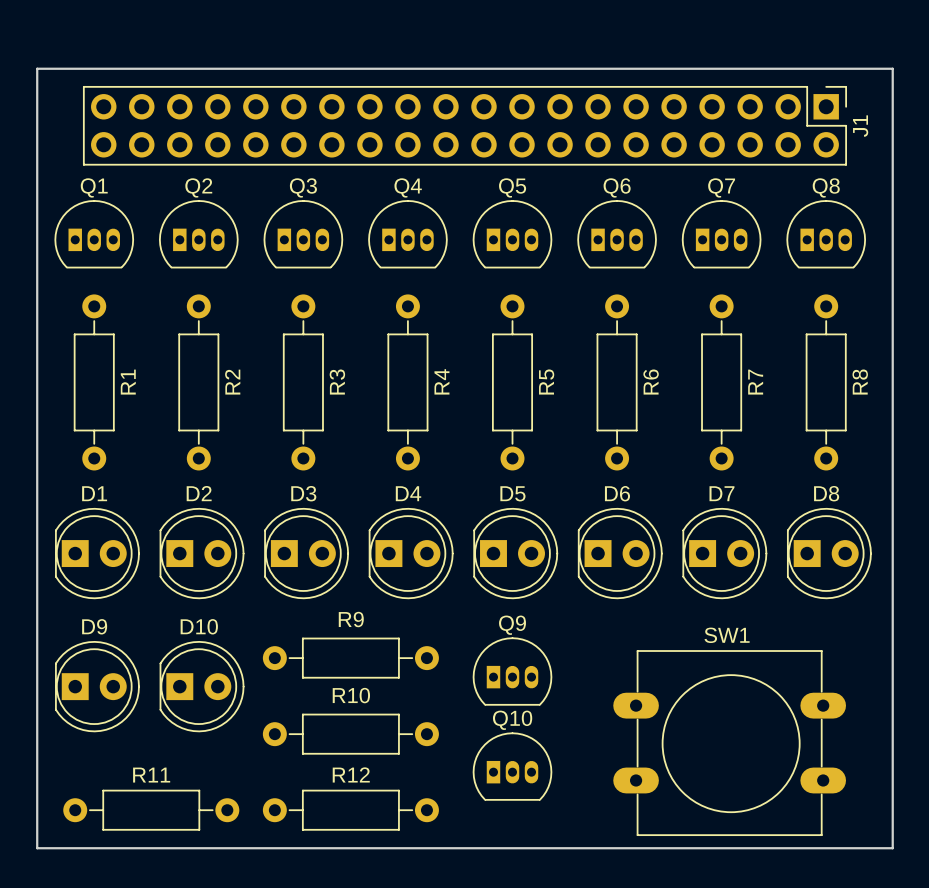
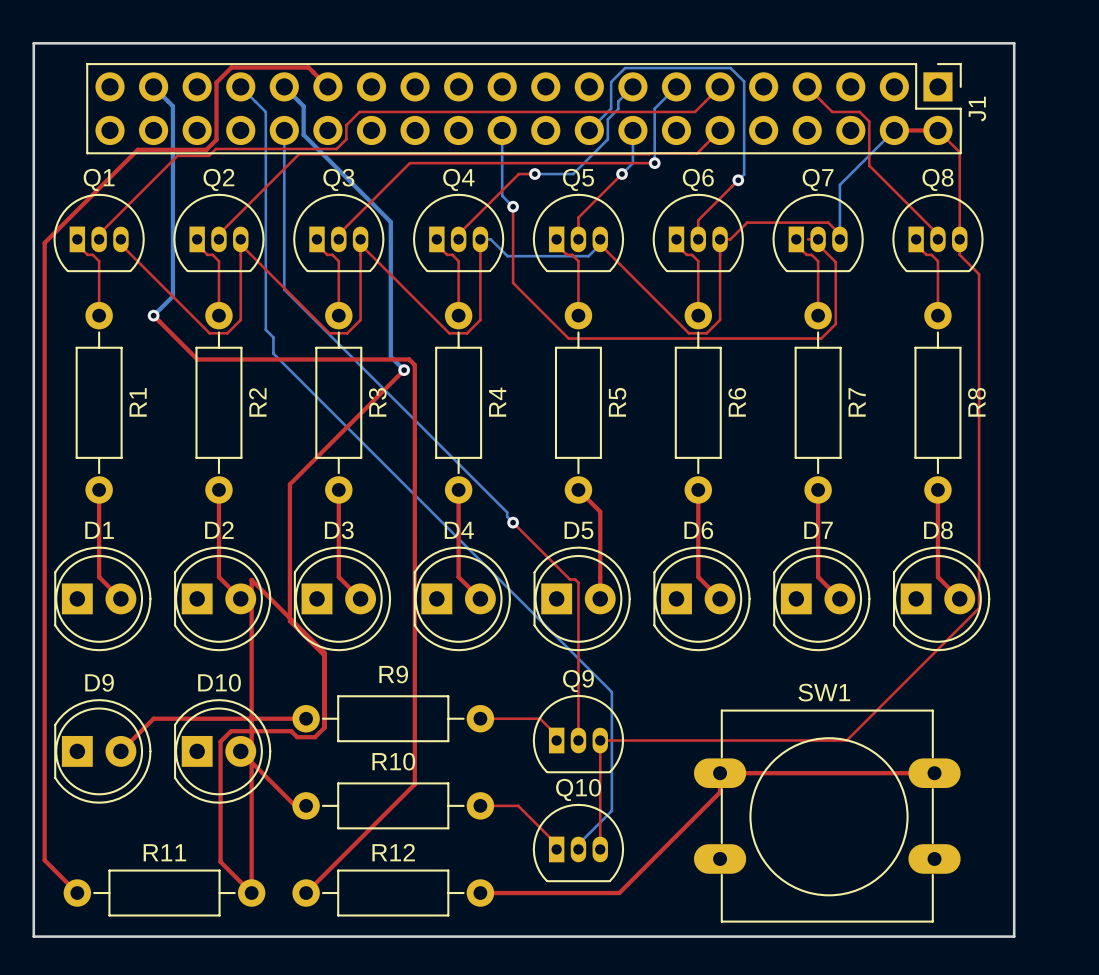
bottom track: none -> (153, 86) (172, 106) (172, 296) (153, 315)
bottom track: none -> (240, 86) (265, 111) (265, 329) (273, 337) (273, 353) (611, 692) (611, 810) (578, 844) (578, 849)
bottom track: none -> (284, 86) (303, 106) (303, 134) (390, 222) (390, 356) (404, 370)
top track: none -> (327, 86) (308, 67) (231, 67) (216, 82) (216, 139) (206, 149) (137, 149) (44, 242) (44, 860) (77, 893)
bottom track: none -> (632, 86) (618, 101) (618, 108) (607, 119) (607, 139) (573, 174) (534, 174)
bottom track: none -> (676, 86) (654, 108) (654, 163)
top track: none -> (720, 86) (695, 111) (359, 111) (346, 125) (346, 139) (336, 148) (215, 148) (208, 155) (177, 155) (99, 234) (99, 239)
top track: none -> (807, 86) (832, 111) (859, 111) (869, 121) (869, 165) (937, 234) (937, 239)
bottom track: none -> (284, 130) (284, 289) (507, 512) (507, 516) (513, 522)
bottom track: none -> (502, 130) (502, 195) (513, 206)
bottom track: none -> (589, 130) (611, 108) (611, 82) (625, 68) (730, 68) (744, 81) (744, 174) (738, 180)
bottom track: none -> (632, 130) (632, 163) (622, 174)
top track: none -> (720, 130) (697, 153) (299, 154) (218, 234) (218, 239)
top track: none -> (894, 130) (937, 130) (959, 152) (959, 254) (979, 274) (979, 608) (846, 740) (600, 740) (600, 849)
bottom track: none -> (894, 130) (839, 184) (839, 239)
top track: none -> (654, 163) (409, 163) (338, 234) (338, 239)
via: none -> (654, 163)
top track: none -> (534, 174) (518, 174) (458, 234) (458, 239)
via: none -> (534, 174)
top track: none -> (622, 174) (578, 217) (578, 239)
via: none -> (622, 174)
top track: none -> (738, 180) (698, 220) (698, 239)
via: none -> (738, 180)
top track: none -> (513, 206) (513, 282) (568, 338) (821, 338) (835, 324) (835, 262) (818, 244) (818, 239) (807, 239)
via: none -> (513, 206)
top track: none -> (77, 239) (77, 244) (87, 254) (92, 254) (99, 261) (99, 315)
top track: none -> (120, 239) (120, 244) (209, 333) (227, 333) (240, 319) (240, 239)
top track: none -> (197, 239) (197, 244) (207, 254) (212, 254) (218, 261) (218, 315)
top track: none -> (317, 239) (317, 244) (327, 254) (332, 254) (338, 261) (338, 315)
top track: none -> (360, 239) (360, 319) (347, 333) (329, 333) (240, 244)
top track: none -> (436, 239) (436, 244) (447, 254) (452, 254) (458, 261) (458, 315)
top track: none -> (480, 239) (480, 319) (467, 333) (449, 333) (360, 244)
bottom track: none -> (480, 239) (490, 239) (507, 256) (588, 256) (600, 244) (600, 239)
top track: none -> (556, 239) (556, 244) (567, 254) (572, 254) (578, 261) (578, 315)
top track: none -> (600, 239) (600, 244) (689, 333) (706, 333) (720, 319) (720, 239) (730, 239) (747, 222) (828, 222) (839, 234) (839, 239)
top track: none -> (676, 239) (676, 244) (686, 254) (691, 254) (698, 261) (698, 315)
top track: none -> (796, 239) (796, 244) (806, 254) (811, 254) (818, 261) (818, 315)
top track: none -> (916, 239) (916, 244) (926, 254) (931, 254) (937, 261) (937, 315)
top track: none -> (153, 315) (197, 359) (409, 359) (414, 365) (414, 784) (306, 893)
via: none -> (153, 315)
top track: none -> (404, 370) (289, 484) (289, 621) (324, 655)
via: none -> (404, 370)
top track: none -> (99, 489) (99, 577) (120, 598)
top track: none -> (218, 489) (218, 577) (240, 598)
top track: none -> (338, 489) (338, 577) (360, 598)
top track: none -> (458, 489) (458, 577) (480, 598)
top track: none -> (578, 489) (600, 511) (600, 598)
top track: none -> (698, 489) (698, 577) (720, 598)
top track: none -> (818, 489) (818, 577) (839, 598)
top track: none -> (937, 489) (937, 577) (959, 598)
top track: none -> (513, 522) (569, 579) (575, 579) (578, 582) (578, 740)
via: none -> (513, 522)
top track: none -> (251, 579) (324, 652) (324, 727) (314, 737) (297, 737) (291, 731) (231, 731) (220, 741) (220, 861) (251, 893) (251, 579)
top track: none -> (306, 718) (153, 718) (120, 751)
top track: none -> (480, 718) (540, 718) (556, 735) (556, 740)
top track: none -> (240, 751) (295, 805) (306, 805)
top track: none -> (934, 773) (720, 773) (720, 792) (619, 893) (480, 893)
top track: none -> (480, 805) (518, 805) (556, 844) (556, 849)

